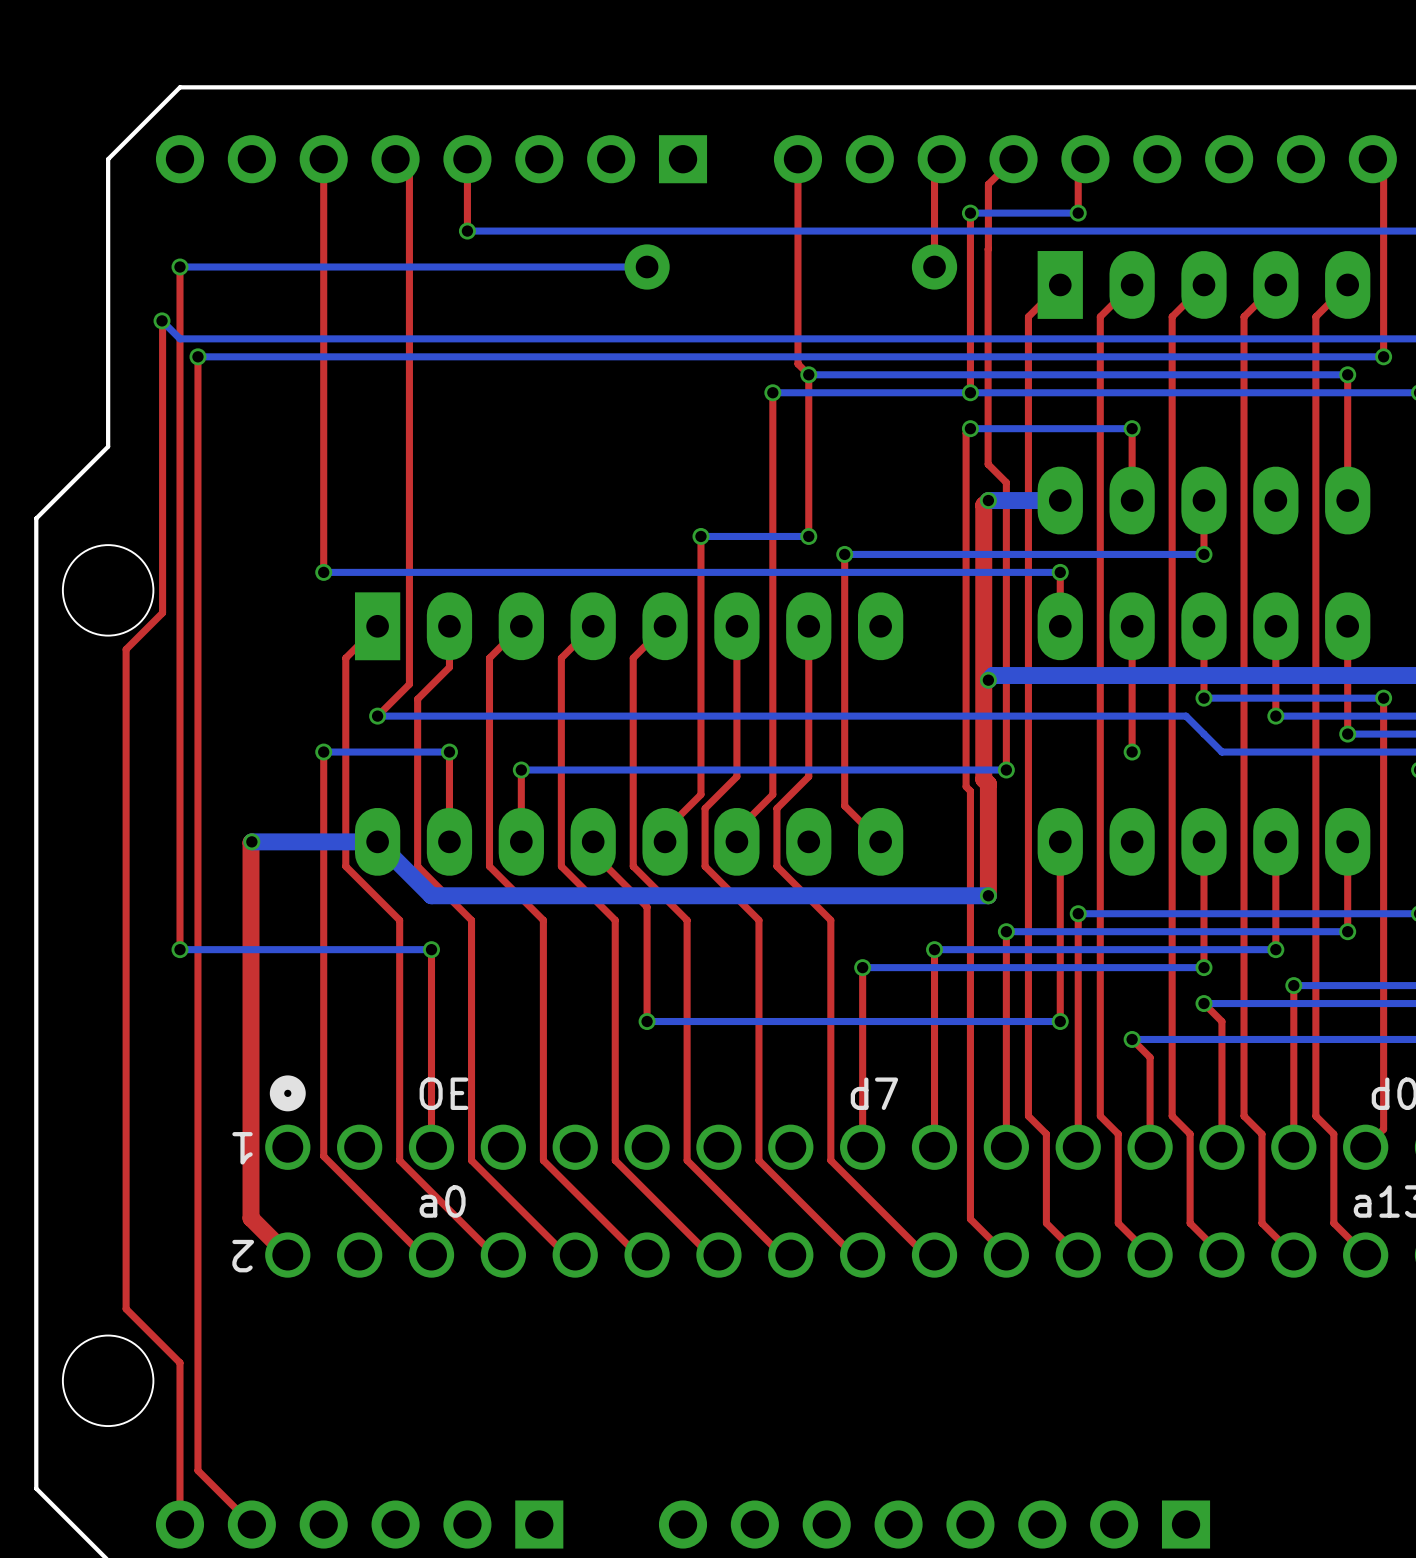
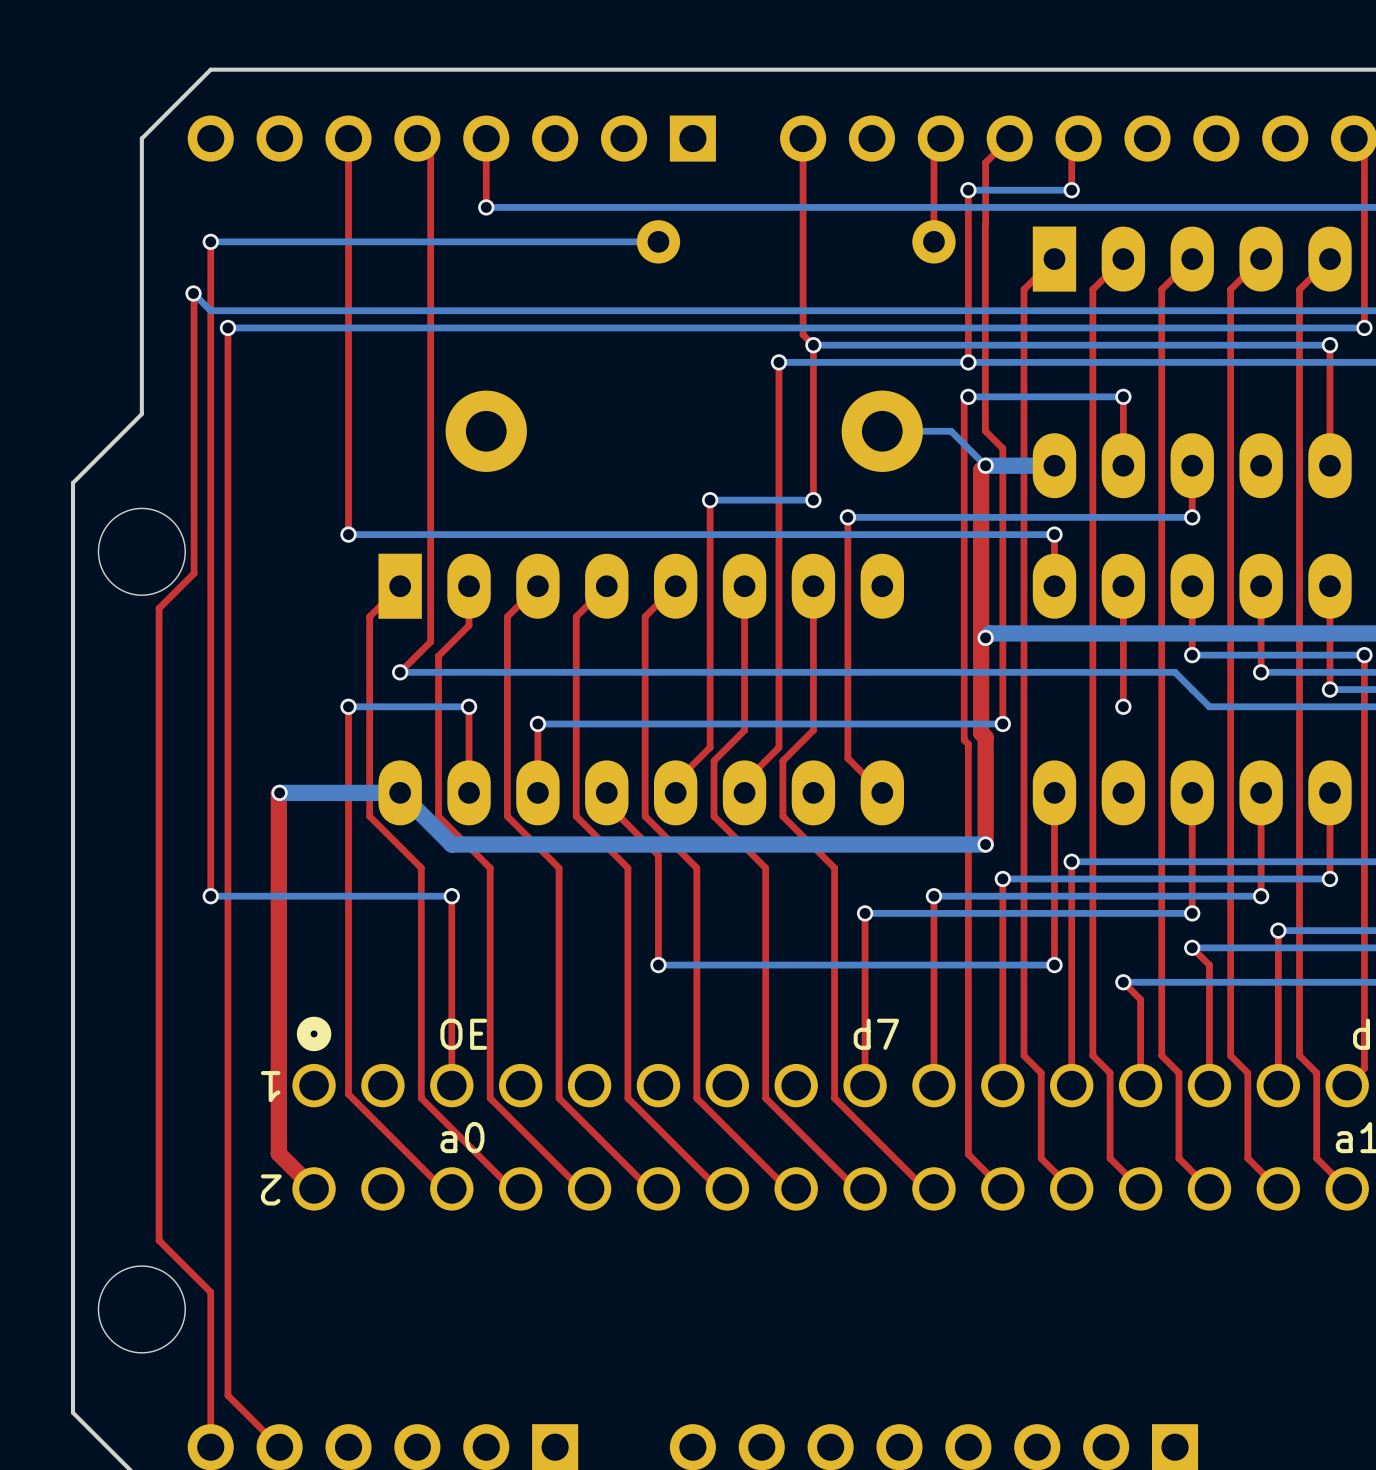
part: none -> (486, 431)
bottom track: none -> (882, 431) (951, 431) (985, 465)
part: none -> (882, 431)

